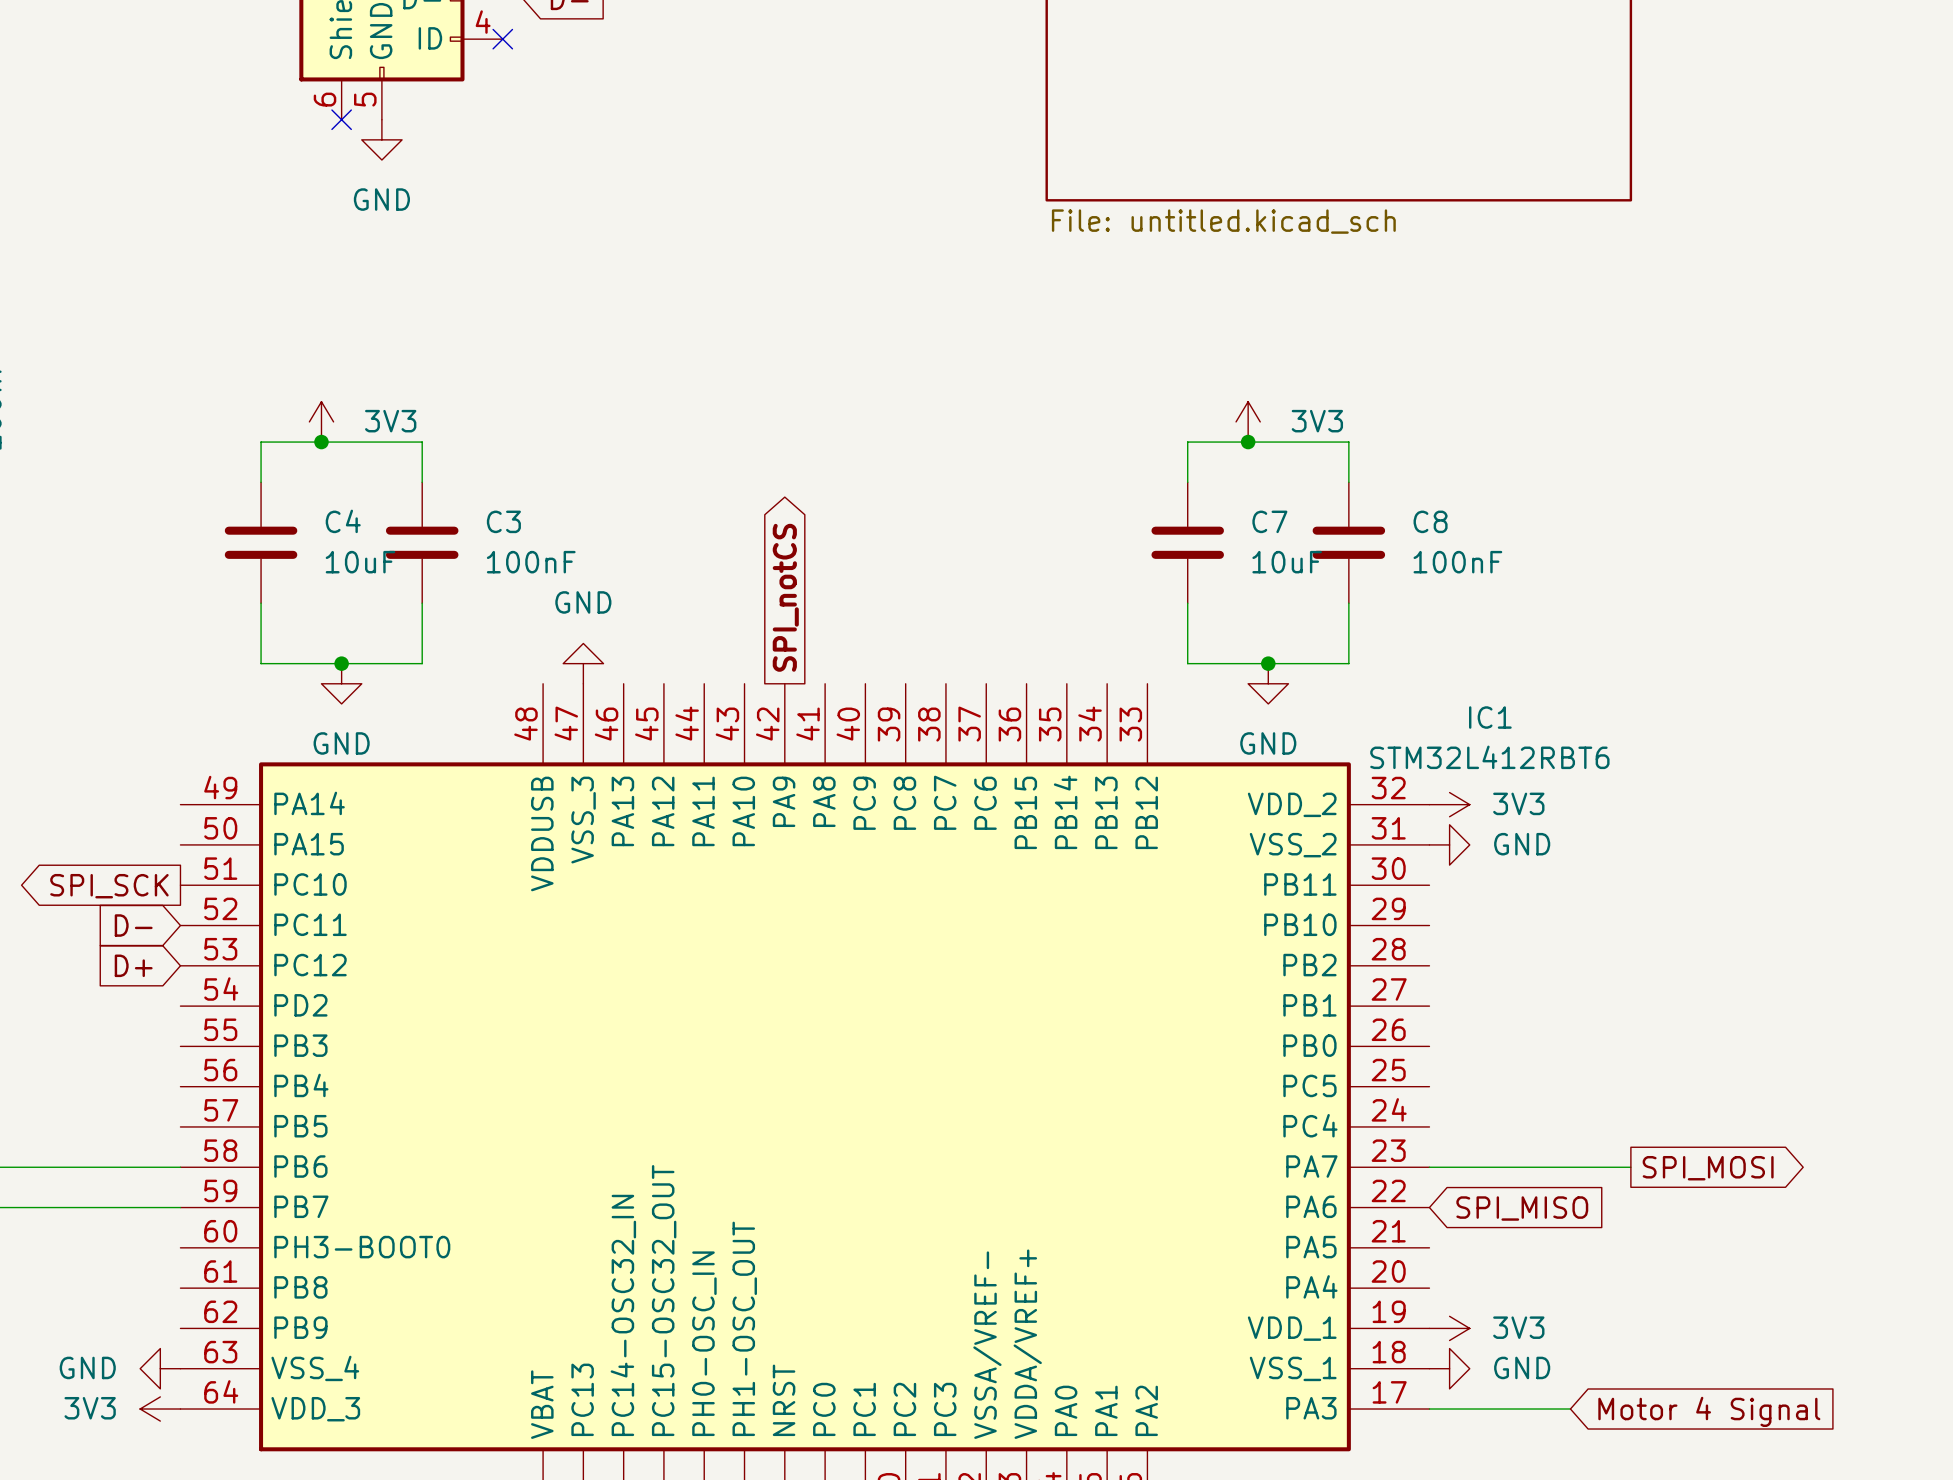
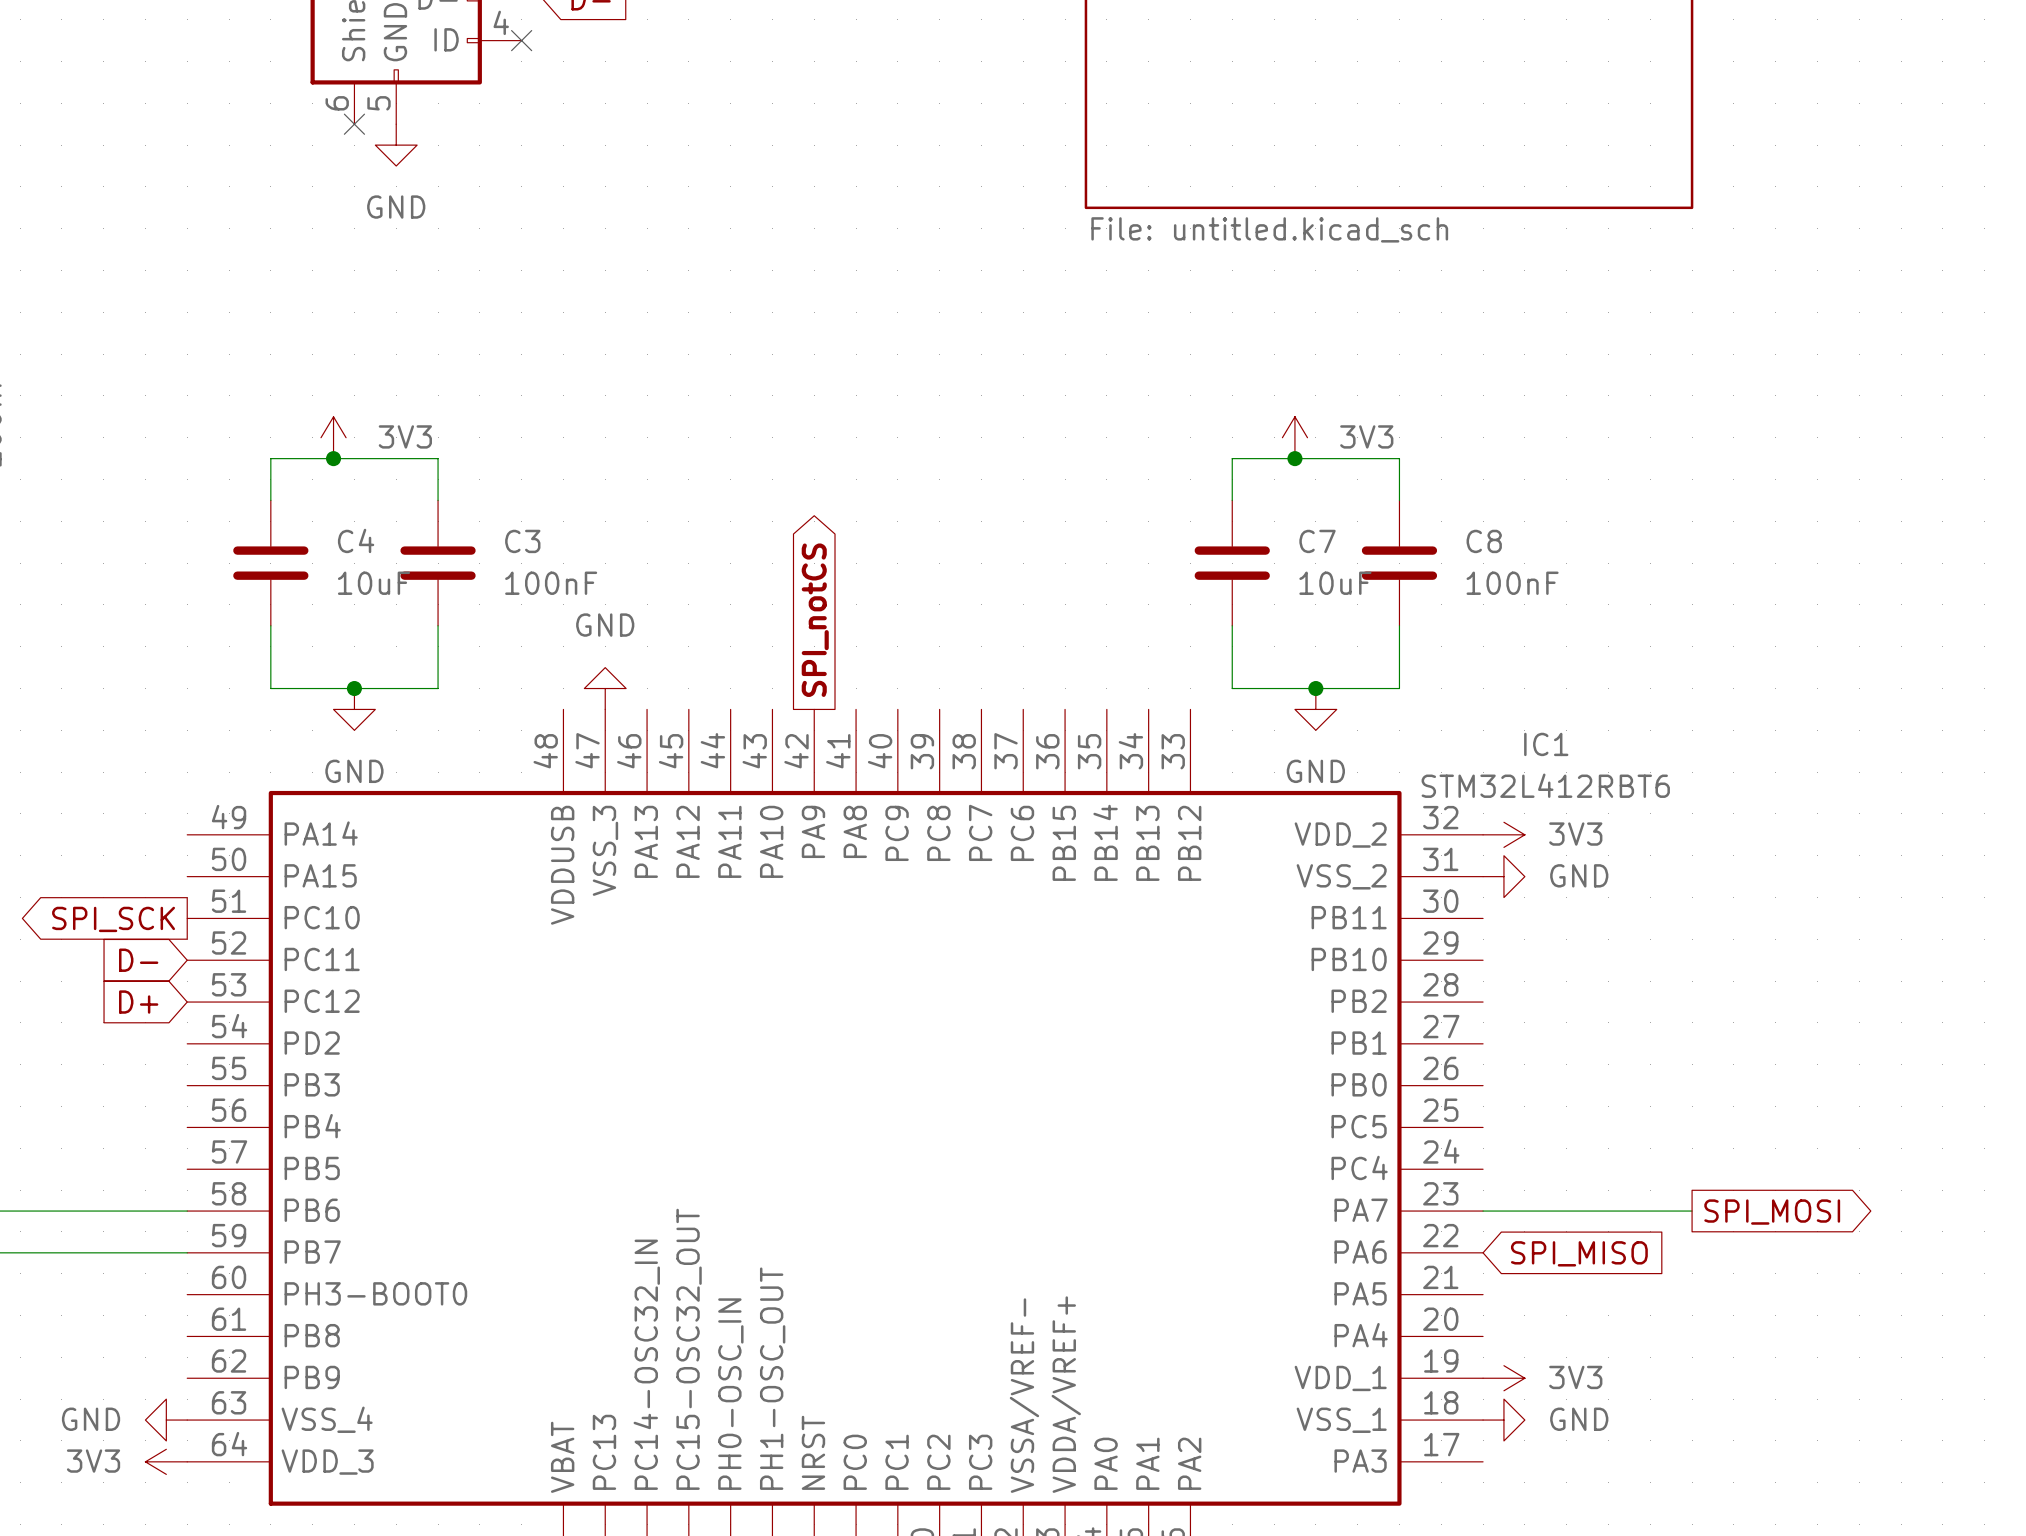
wire: (1429, 1409) (1570, 1409) -> none
global label: Motor 4 Signal (1709, 1411) -> none

